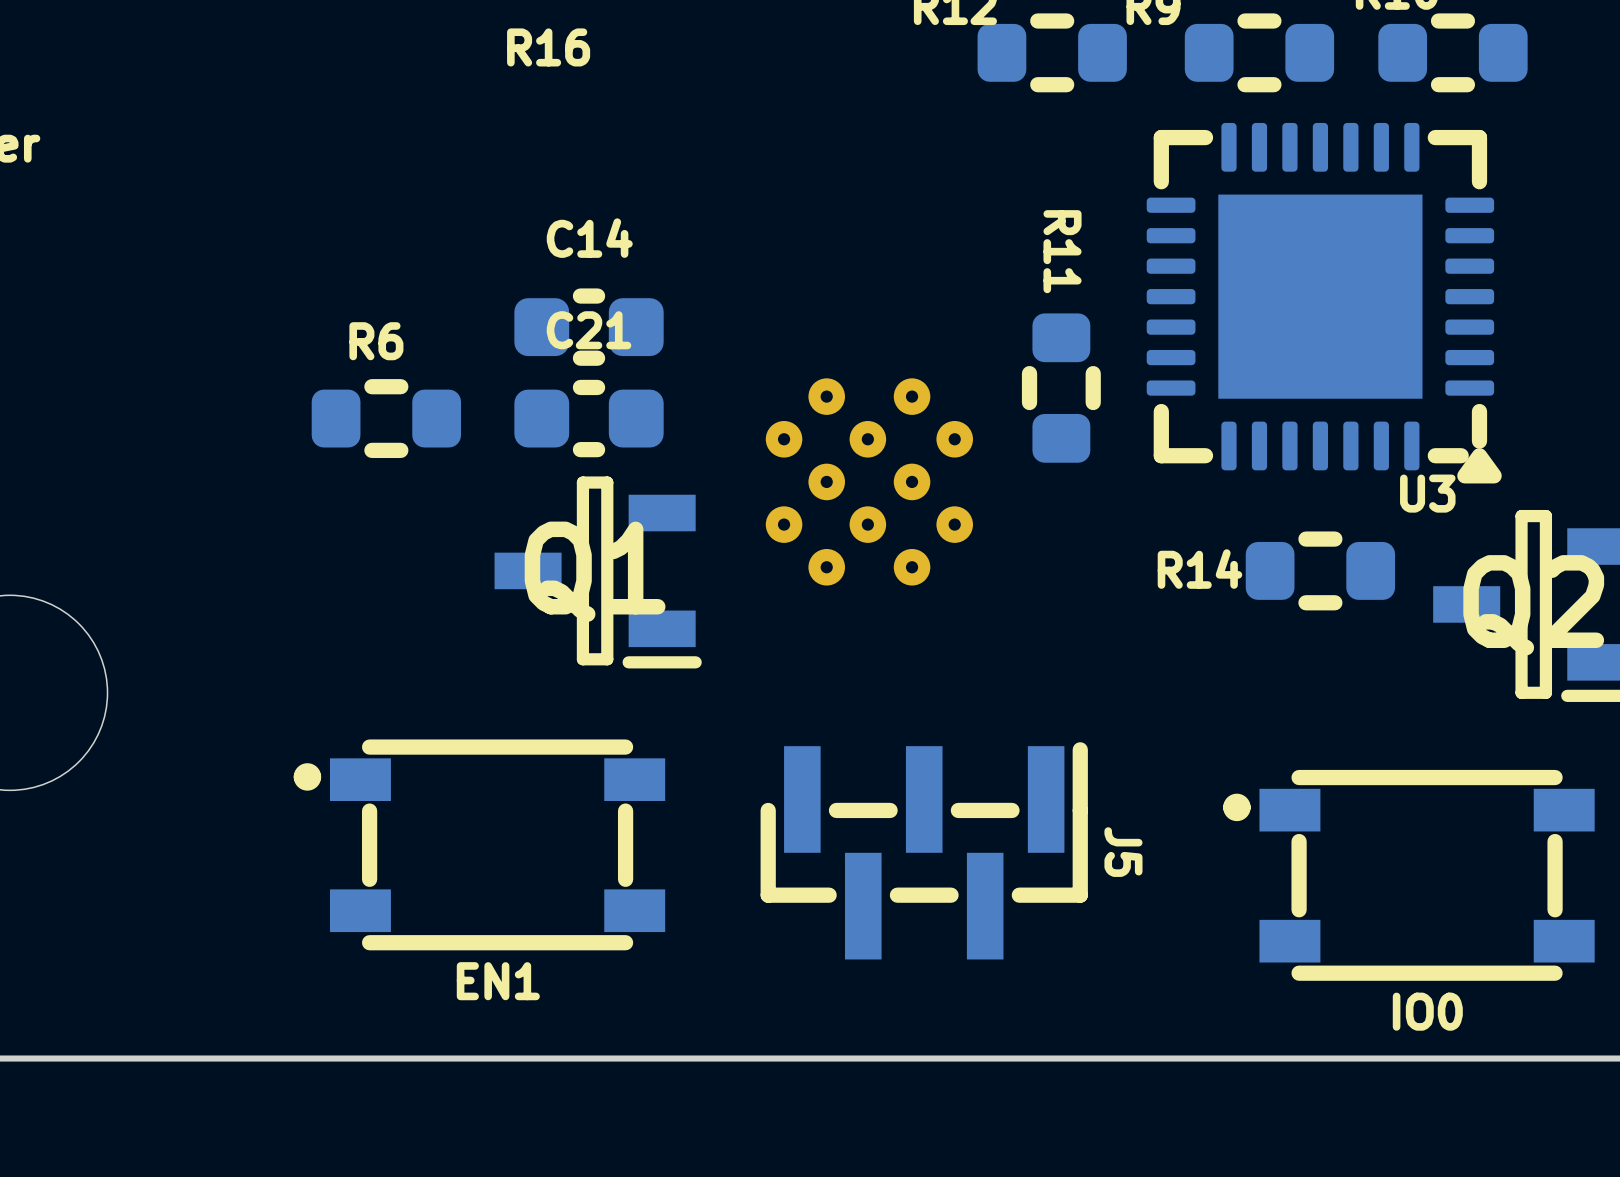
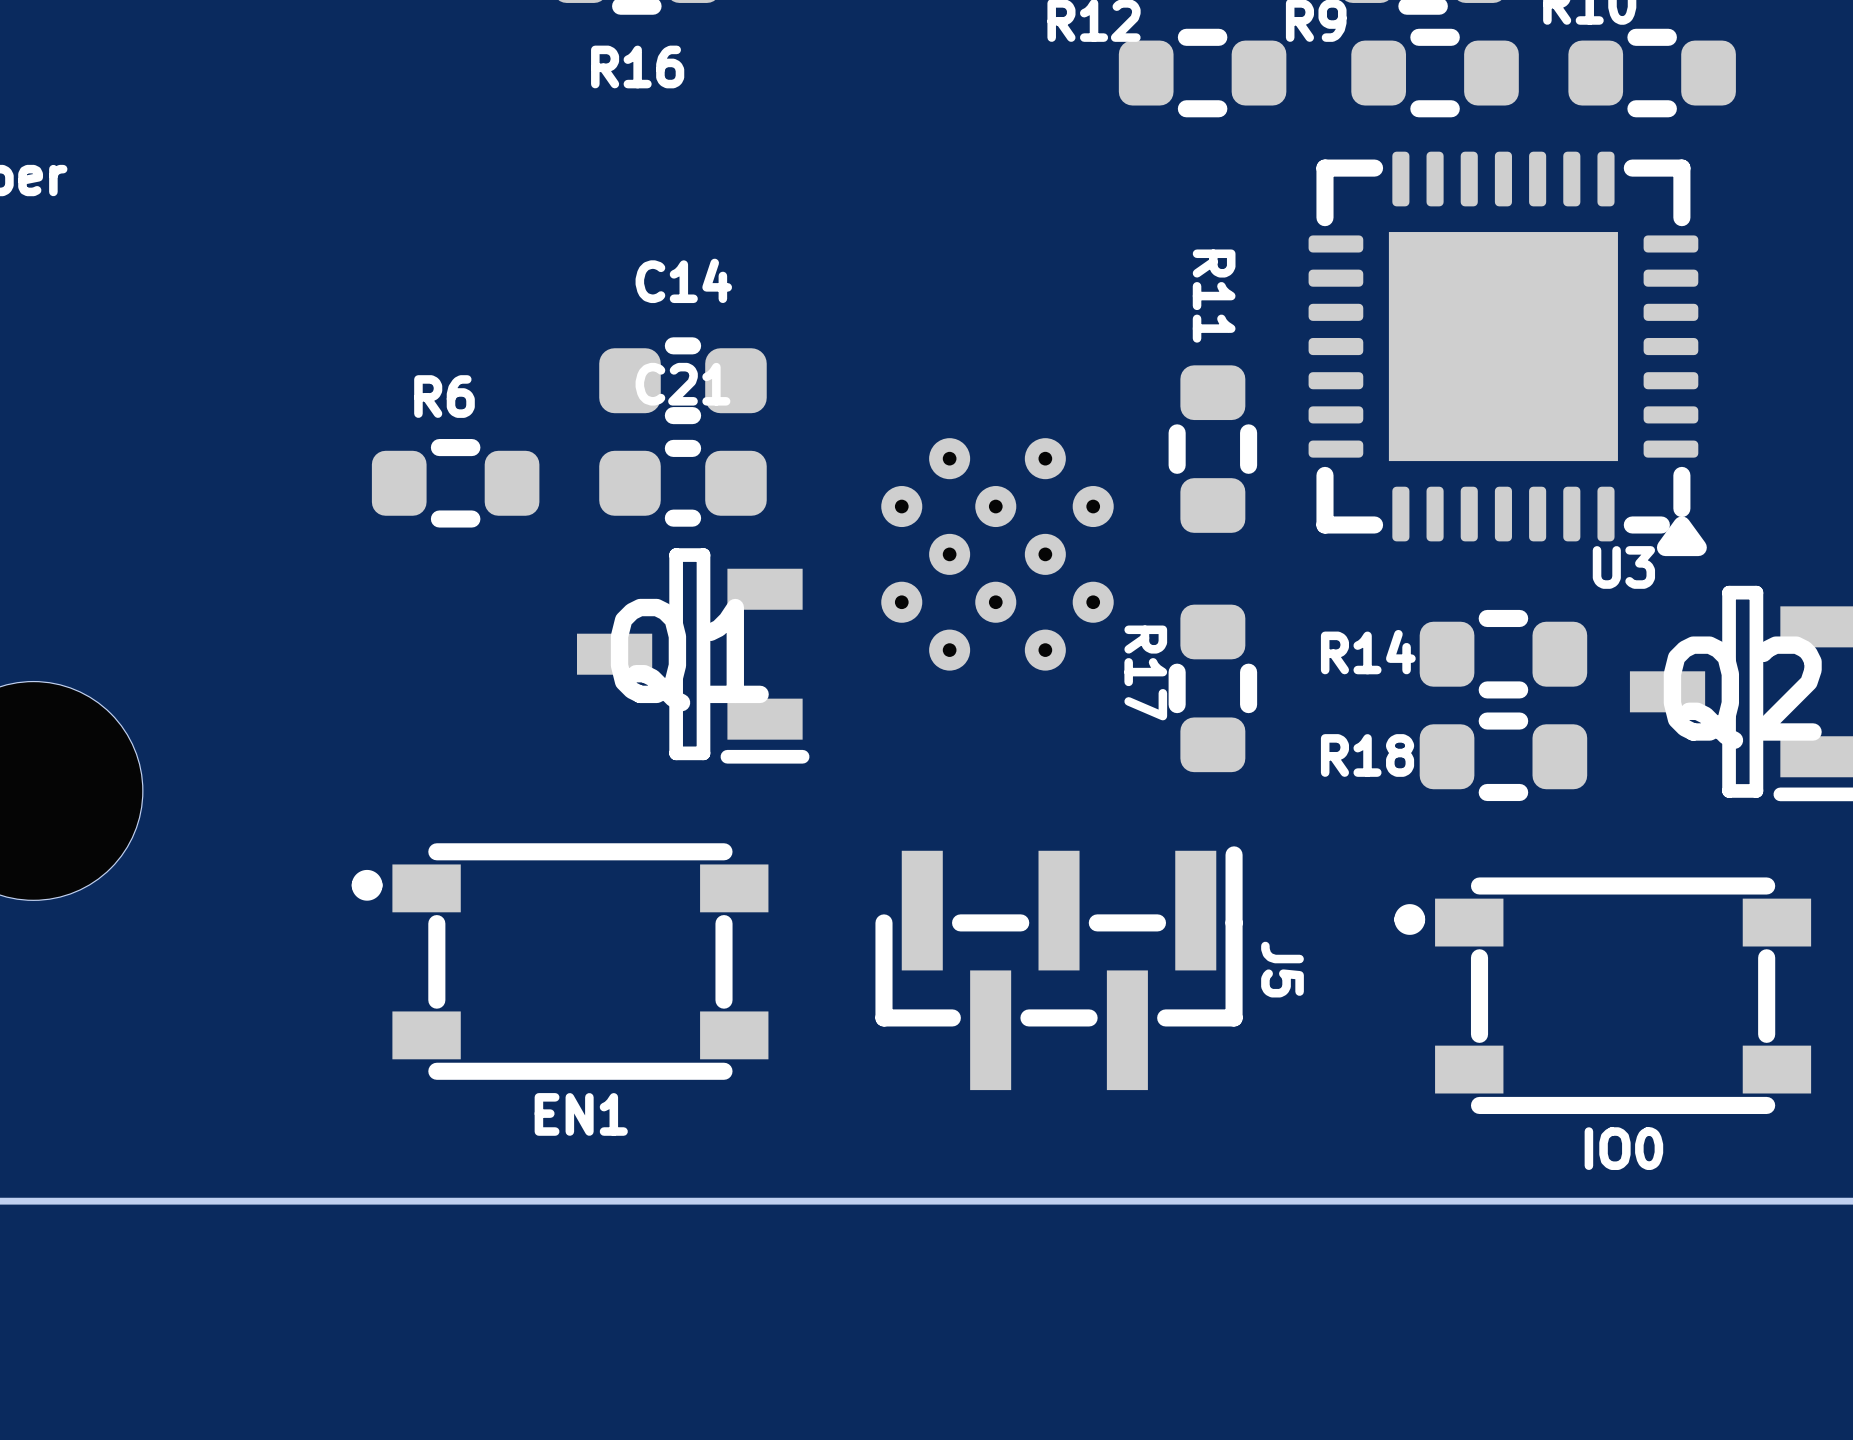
R17: none -> (1212, 688)
R18: none -> (1503, 756)

